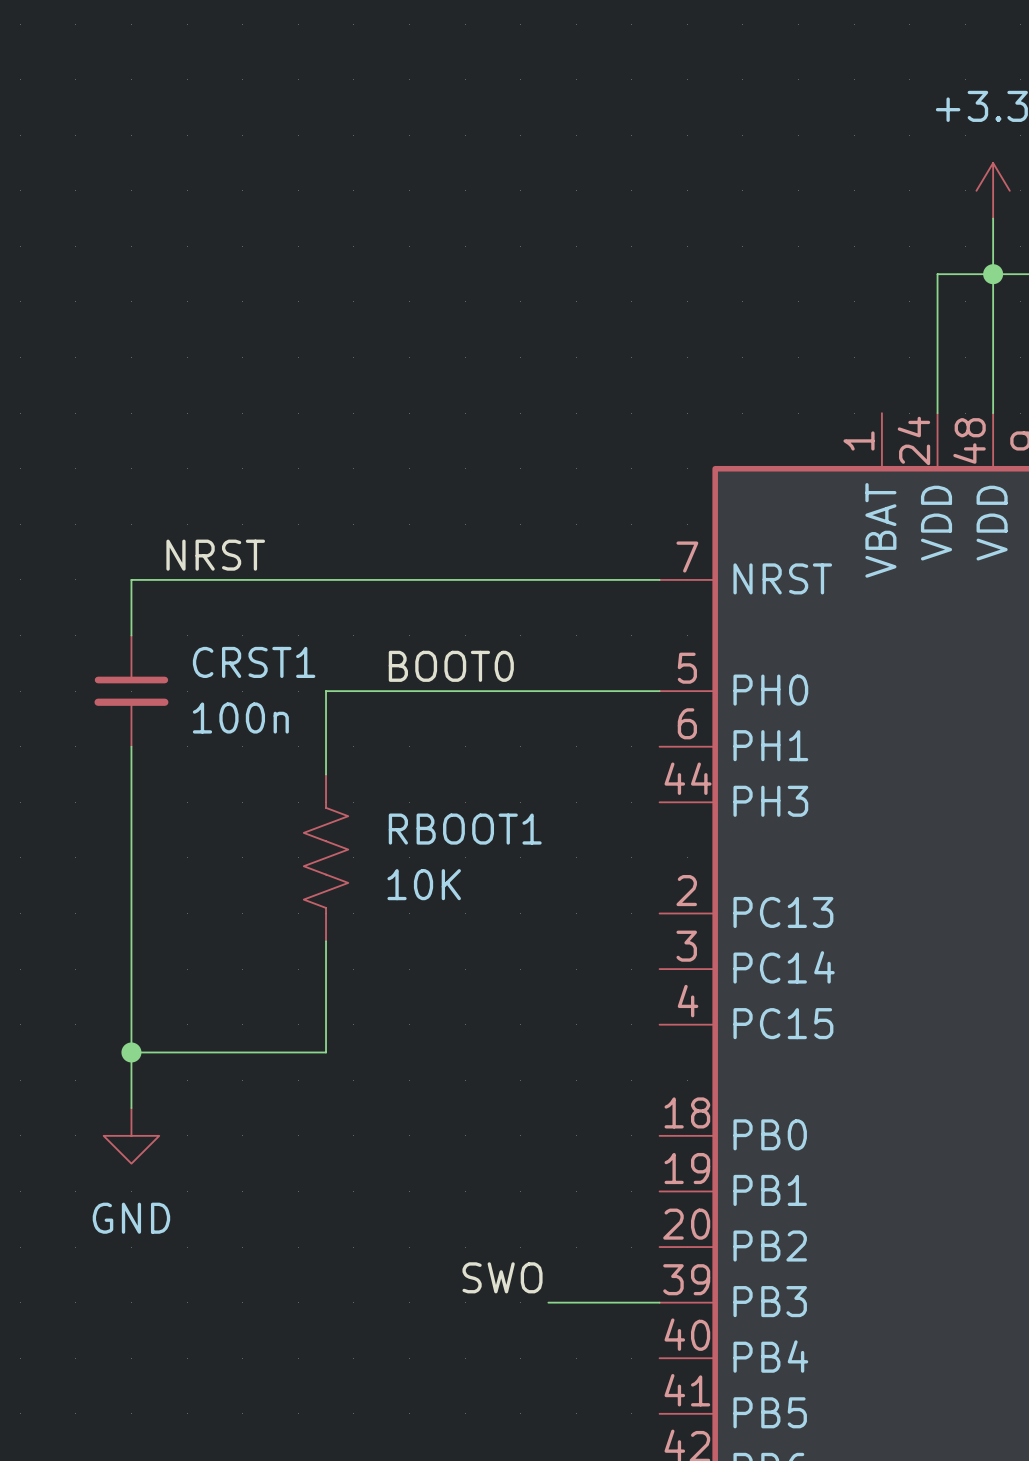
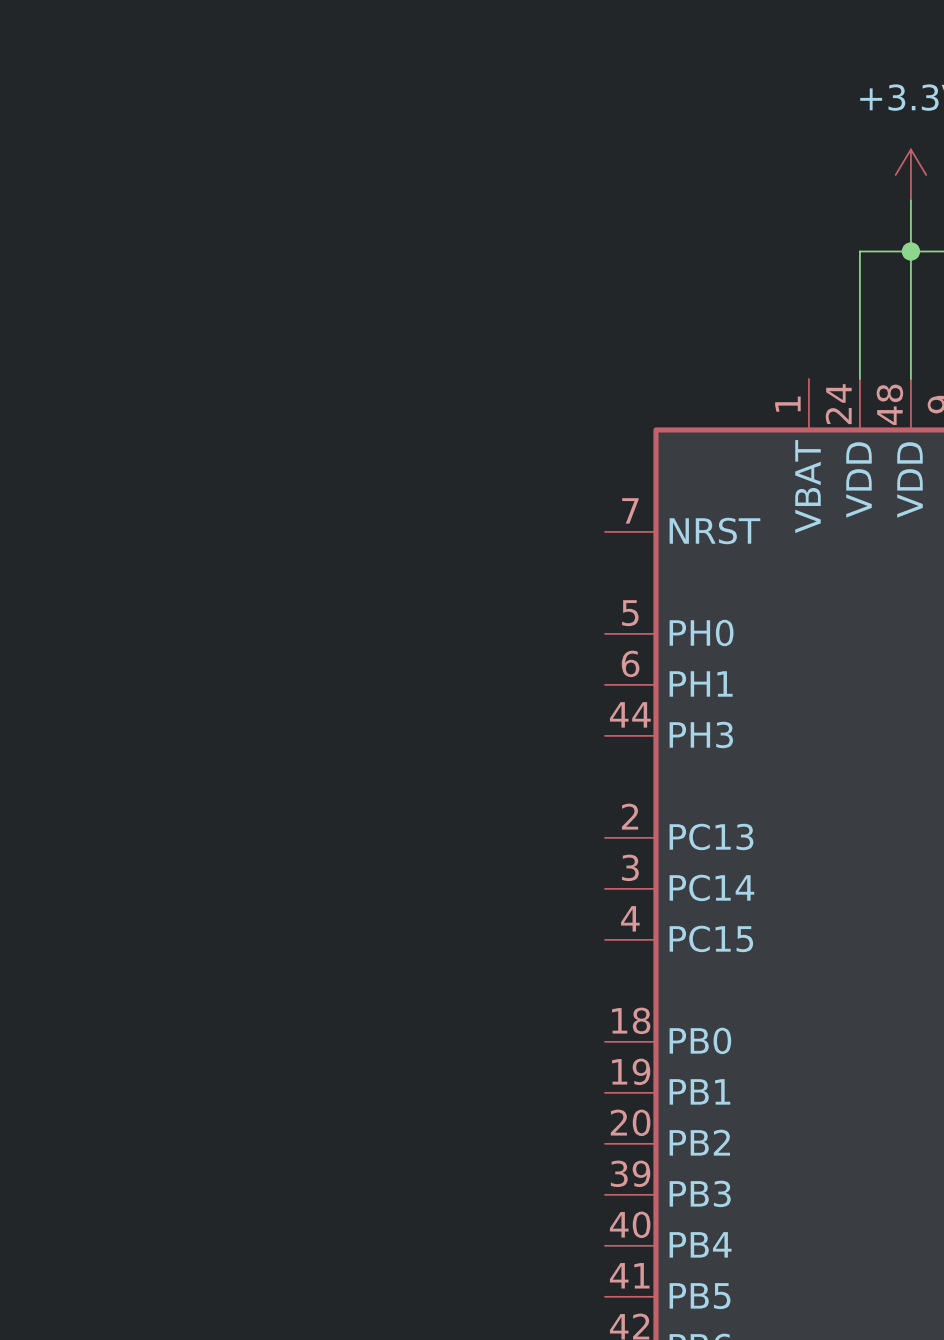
label: NRST (215, 555) -> none
wire: (659, 579) (131, 579) (131, 635) -> none
label: BOOT0 (451, 666) -> none
CRST1: 100n (131, 691) -> none
wire: (659, 691) (326, 691) (326, 774) -> none
wire: (131, 746) (131, 1108) -> none
RBOOT1: 10K (326, 857) -> none
wire: (326, 941) (326, 1052) (131, 1052) -> none
junction: (131, 1052) -> none
power symbol: GND (131, 1135) -> none
label: SWO (502, 1277) -> none
wire: (548, 1302) (659, 1302) -> none

